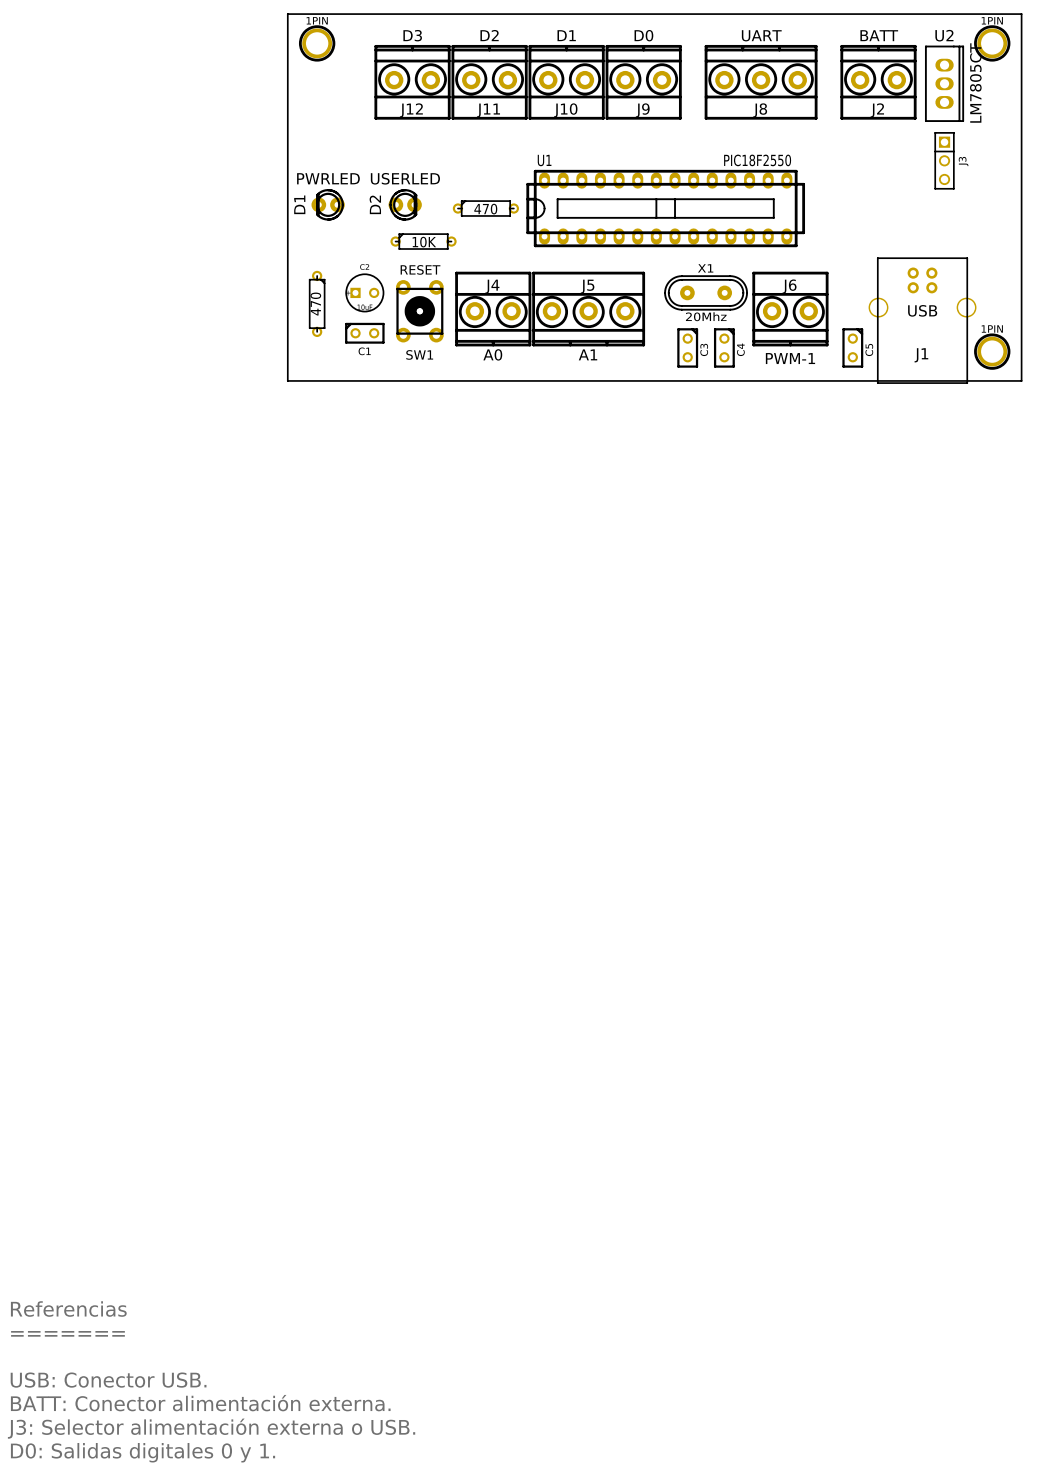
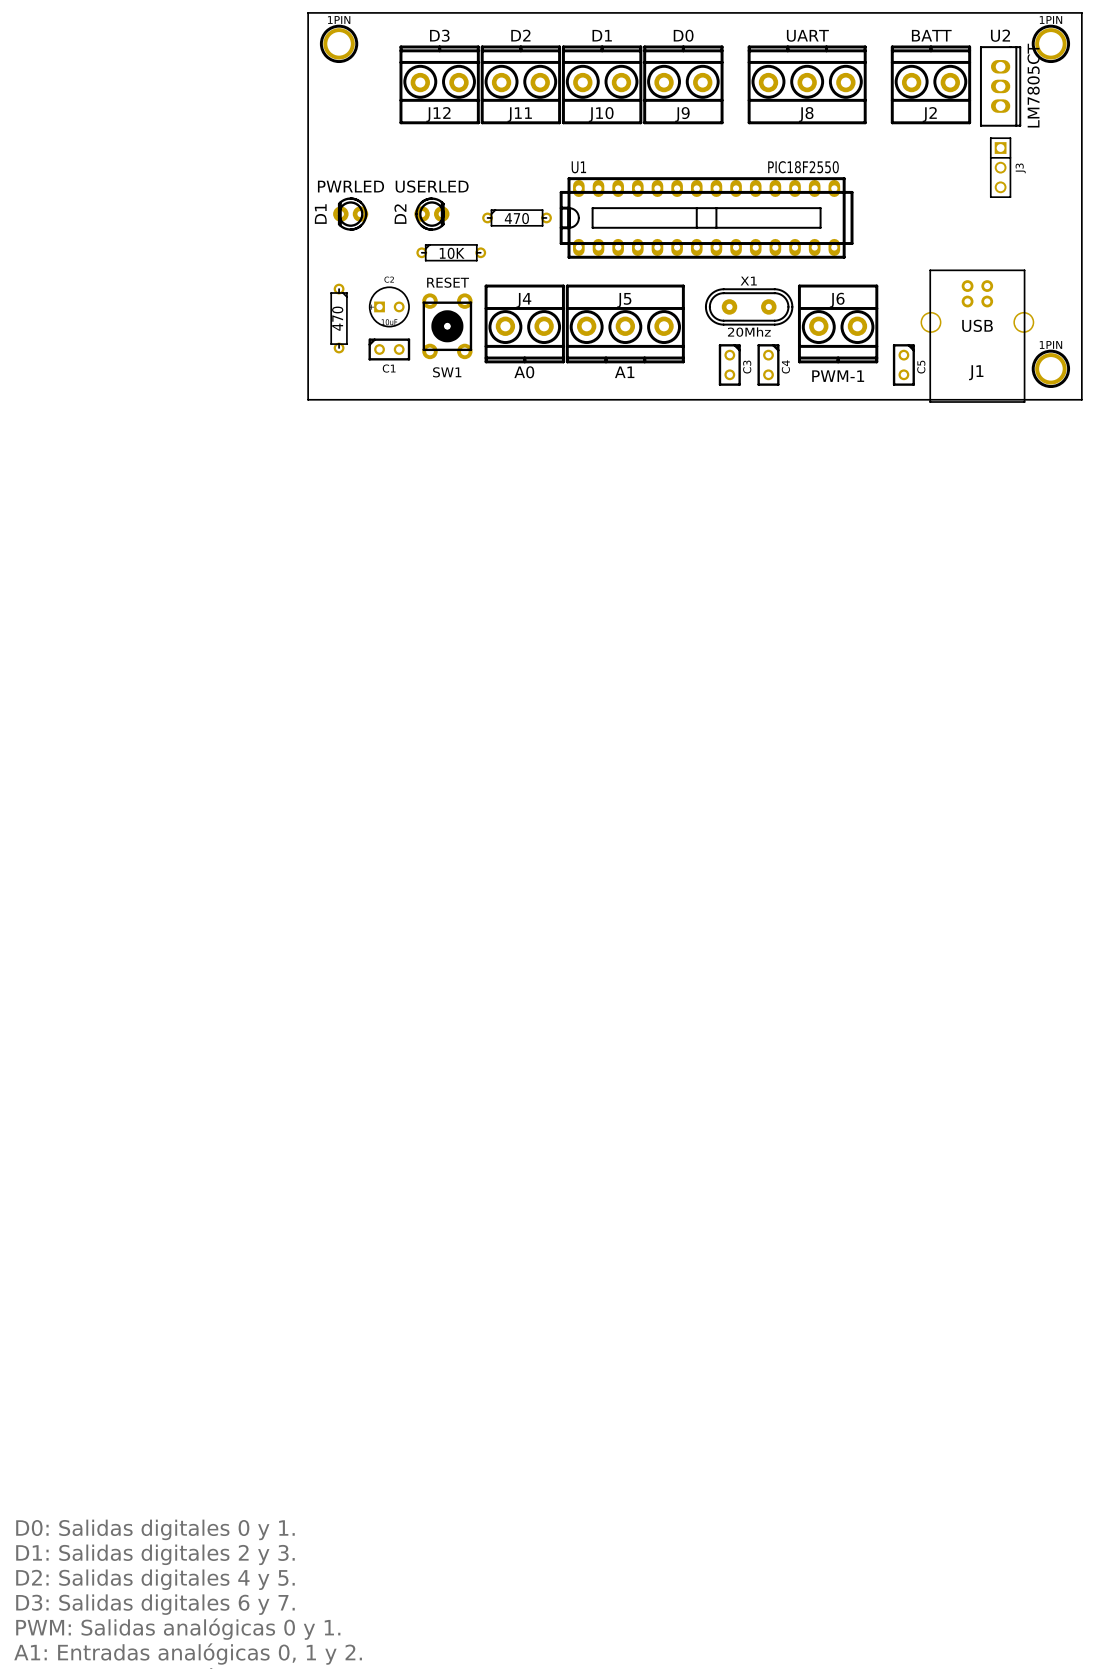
text: Referencias (68, 1309) -> none
text: ======= (67, 1333) -> none
text: USB: Conector USB. (108, 1380) -> none
text: BATT: Conector alimentación externa. (200, 1403) -> none
text: J3: Selector alimentación externa o USB. (211, 1428) -> none

